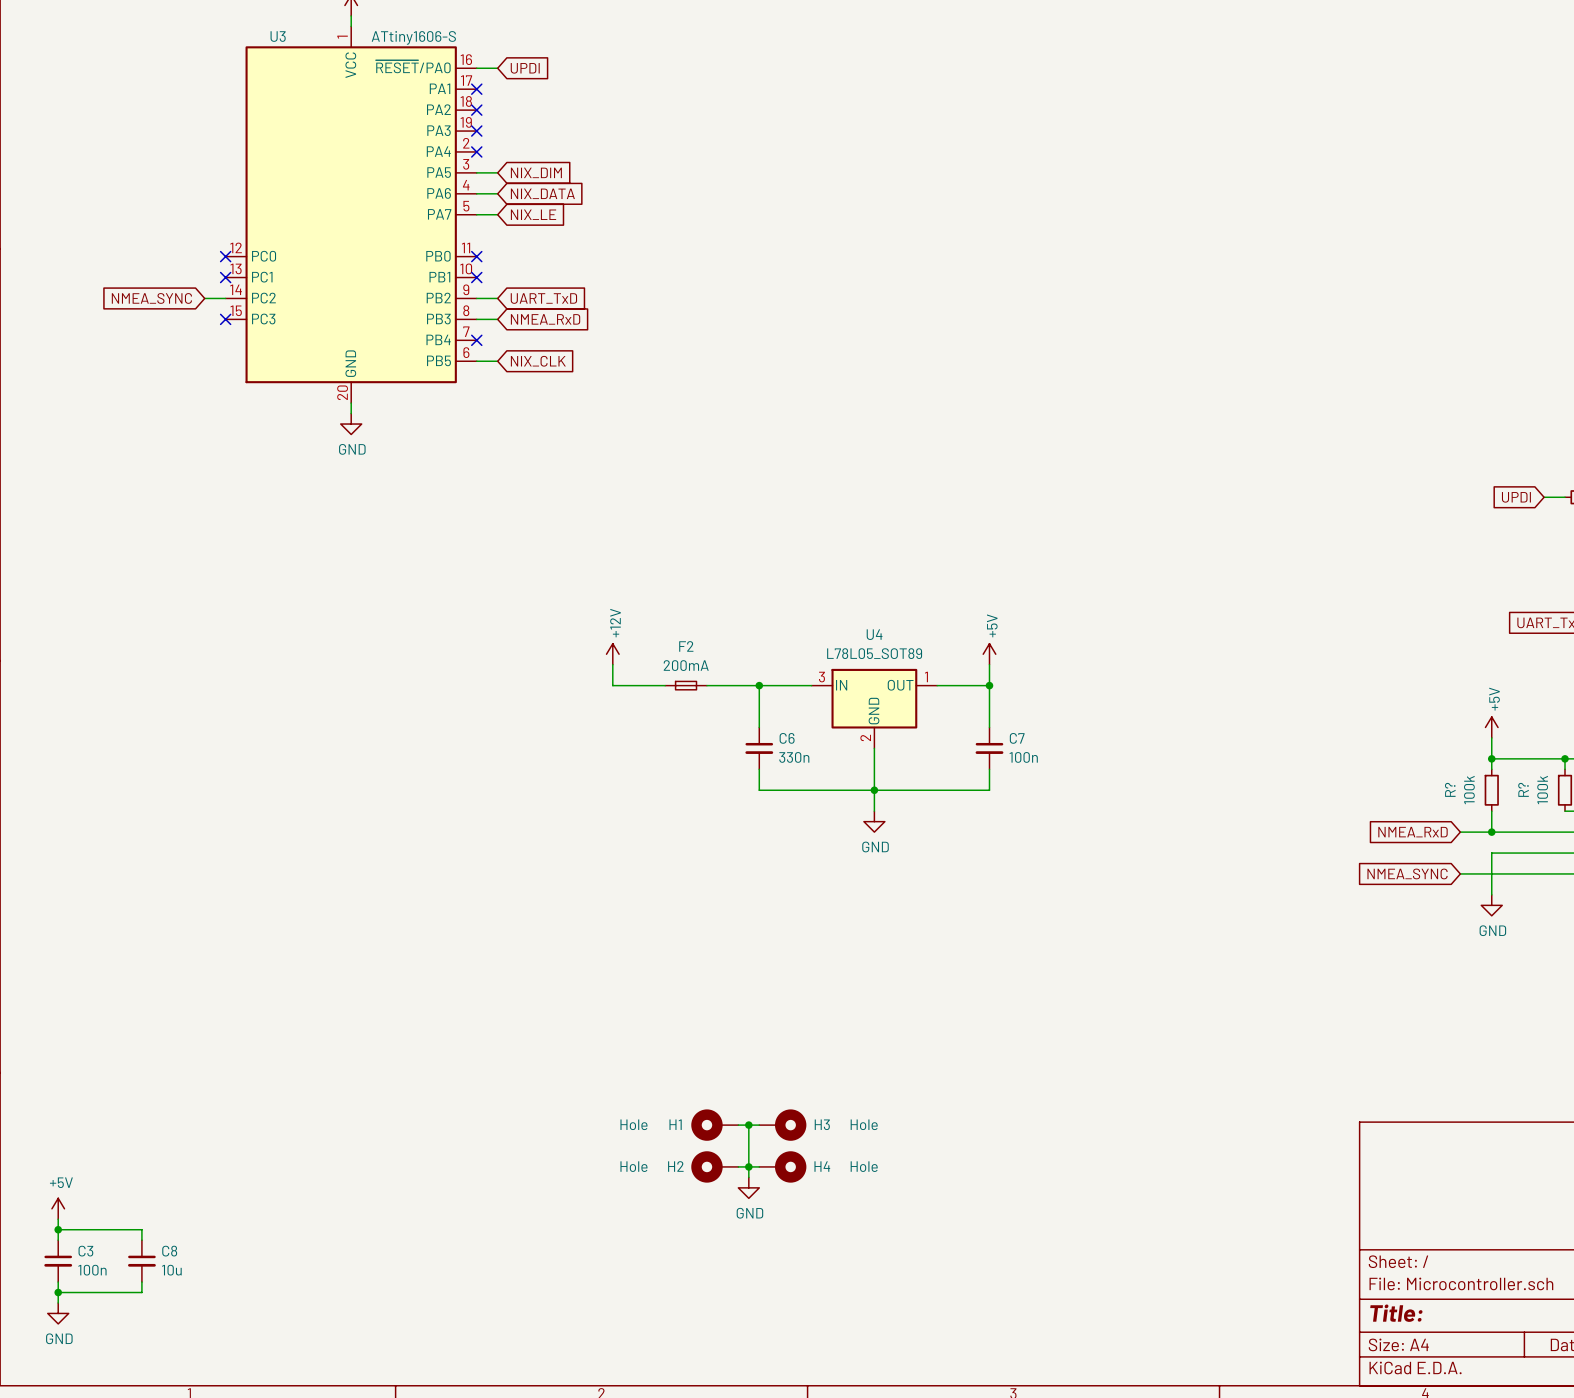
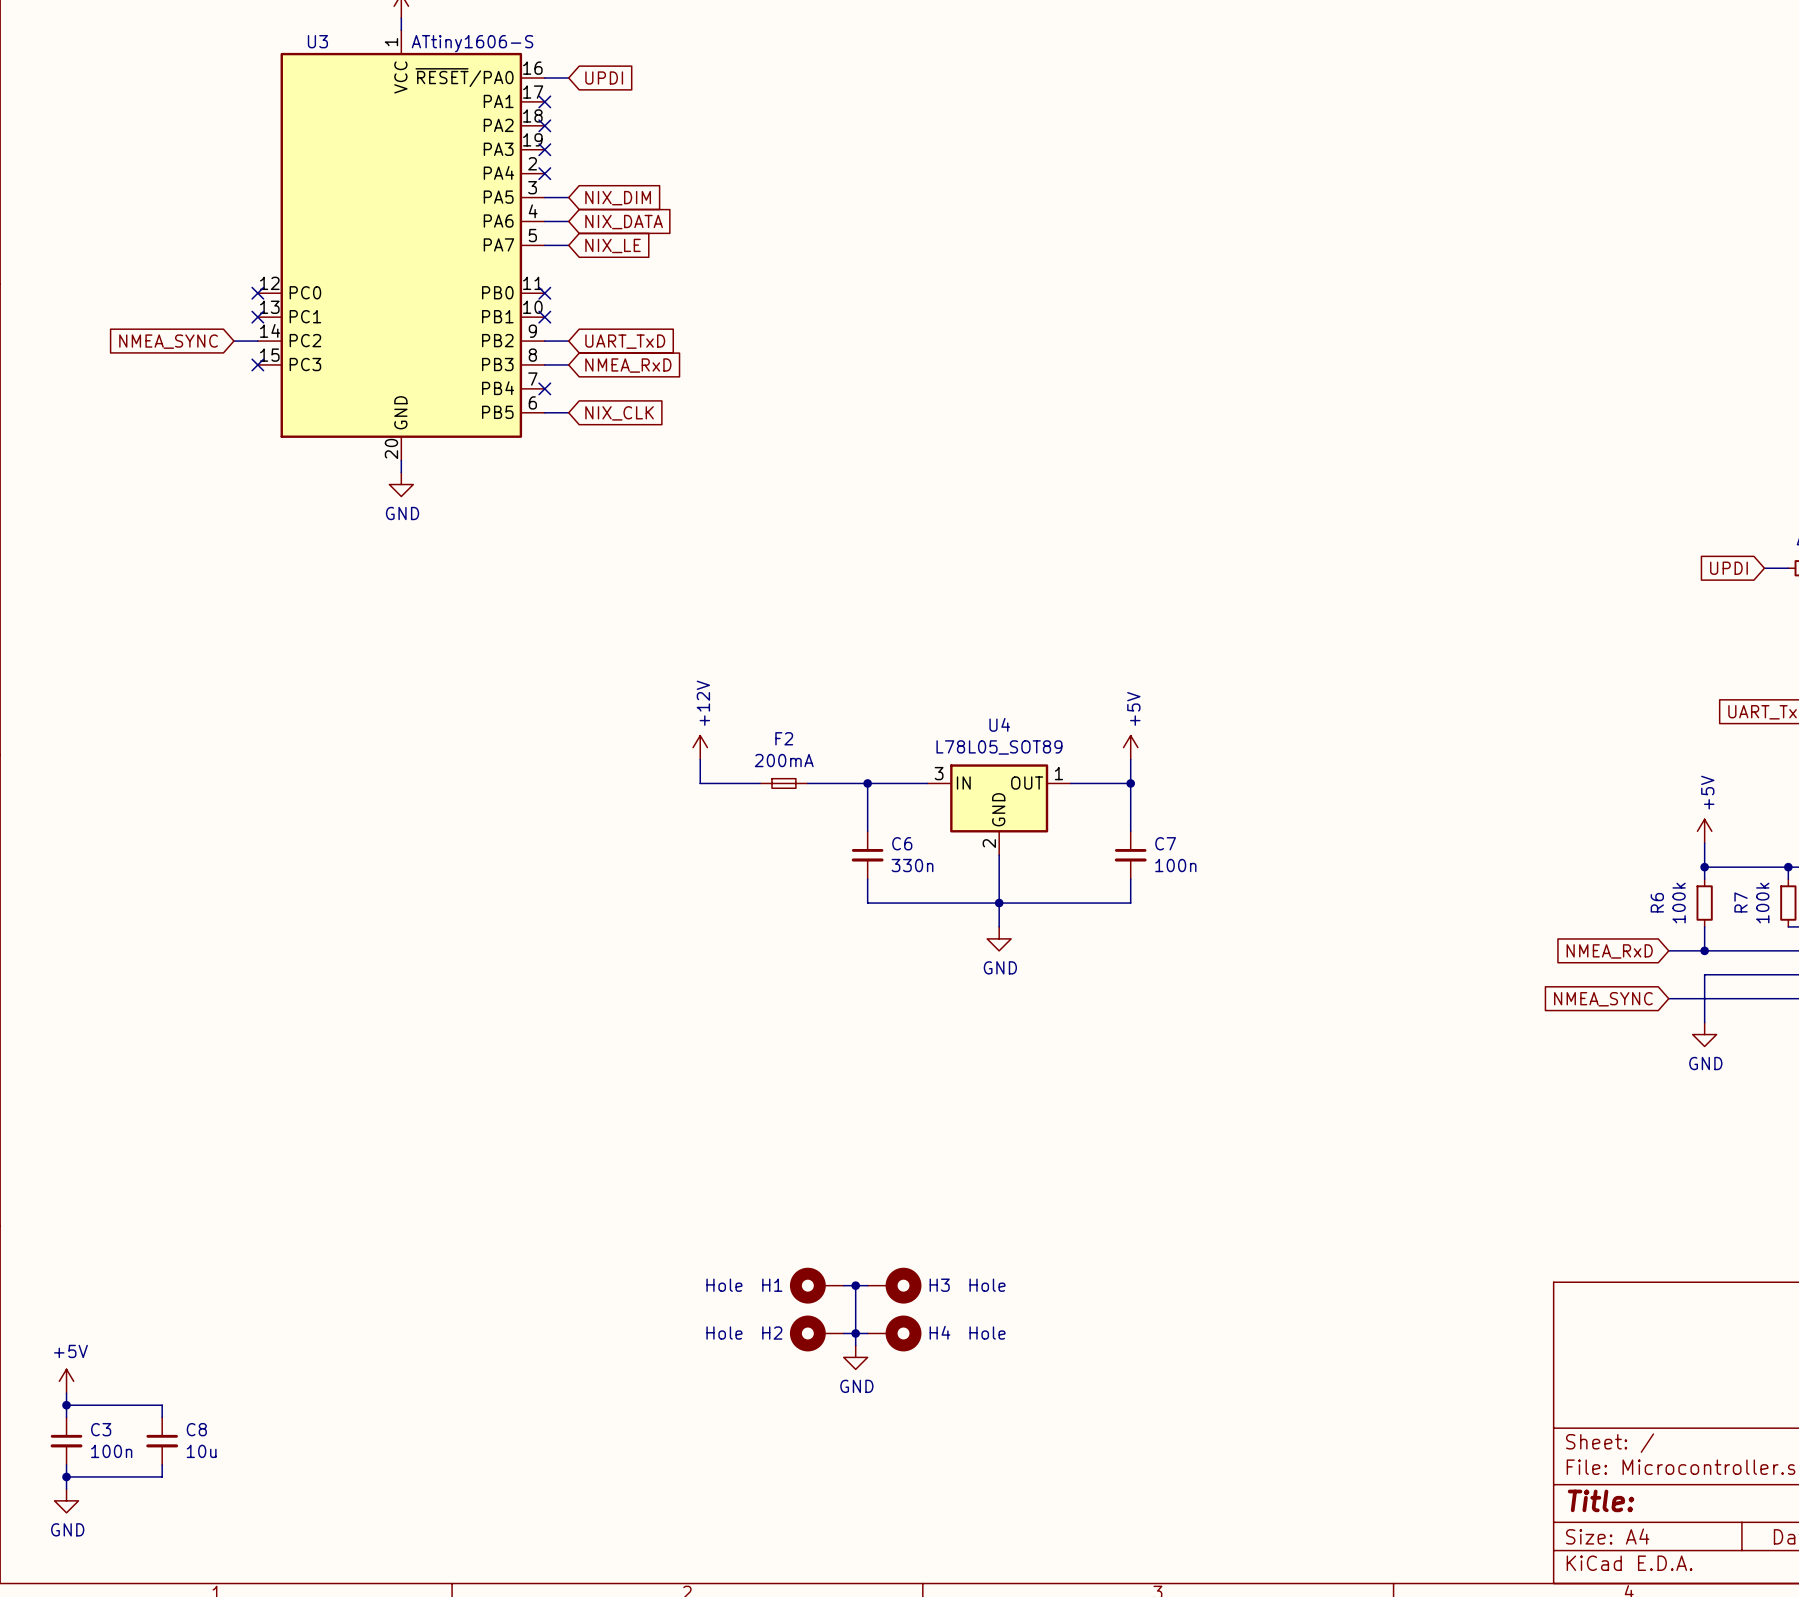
R? name: R? (1450, 789) -> R6 (1657, 902)
R? name: R? (1523, 789) -> R7 (1741, 902)

